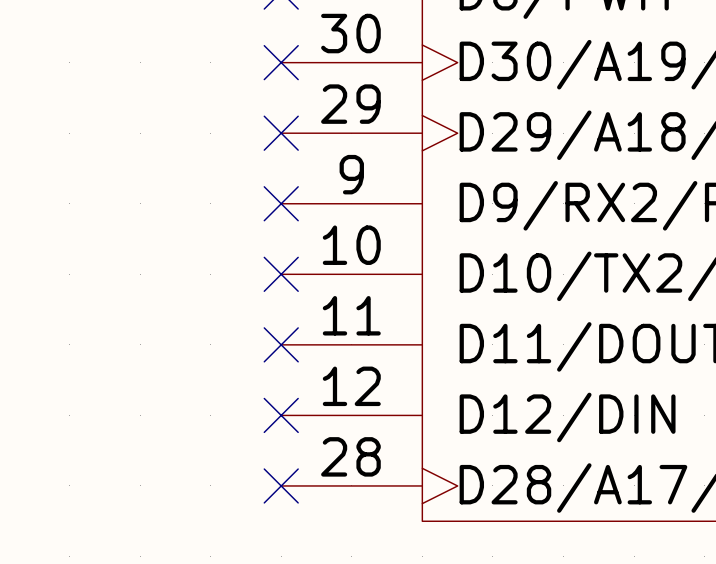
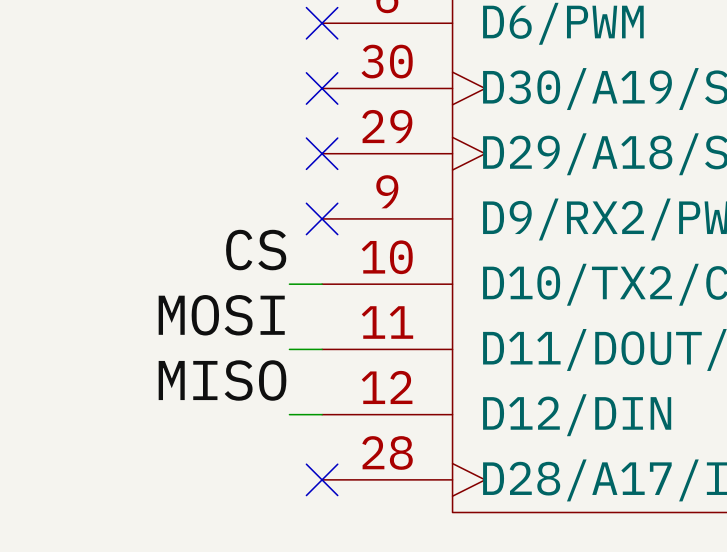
label: none -> CS (256, 250)
wire: none -> (289, 284) (322, 284)
no-connect mark: (281, 274) -> none
label: none -> MOSI (221, 315)
wire: none -> (289, 349) (322, 349)
no-connect mark: (281, 344) -> none
label: none -> MISO (222, 380)
wire: none -> (289, 414) (322, 414)
no-connect mark: (281, 415) -> none

